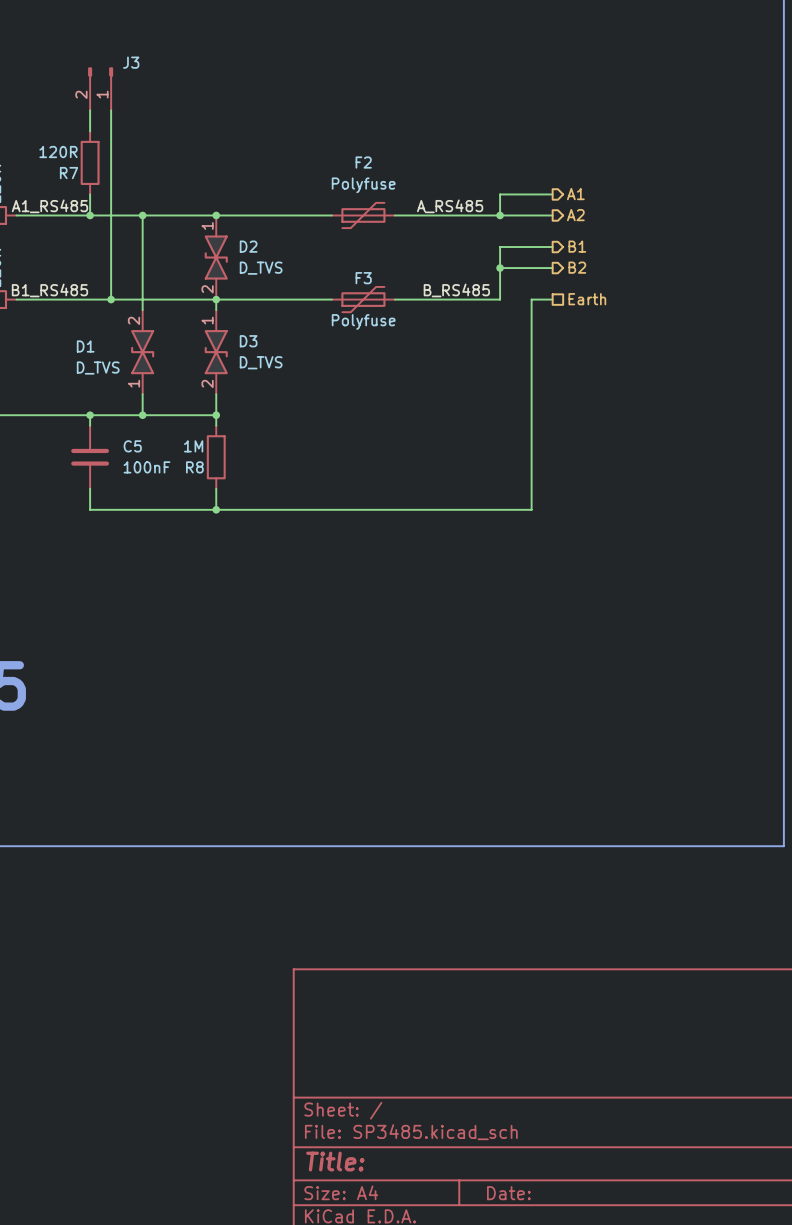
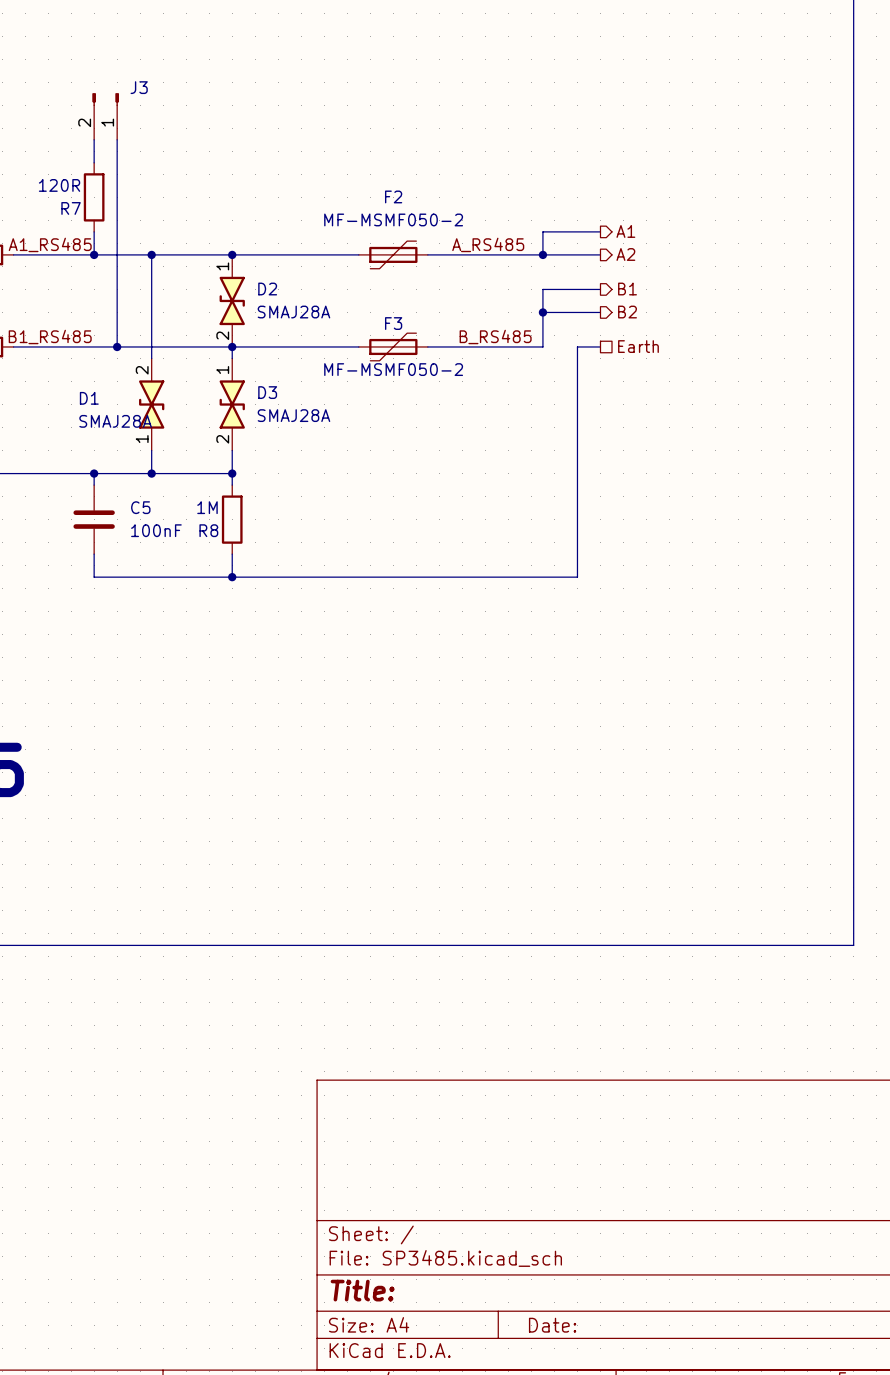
F2 value: Polyfuse (363, 185) -> MF-MSMF050-2 (393, 219)
D2 value: D_TVS (261, 268) -> SMAJ28A (293, 312)
F3 value: Polyfuse (363, 321) -> MF-MSMF050-2 (393, 369)
D3 value: D_TVS (261, 362) -> SMAJ28A (293, 415)
D1 value: D_TVS (98, 368) -> SMAJ28A (115, 421)

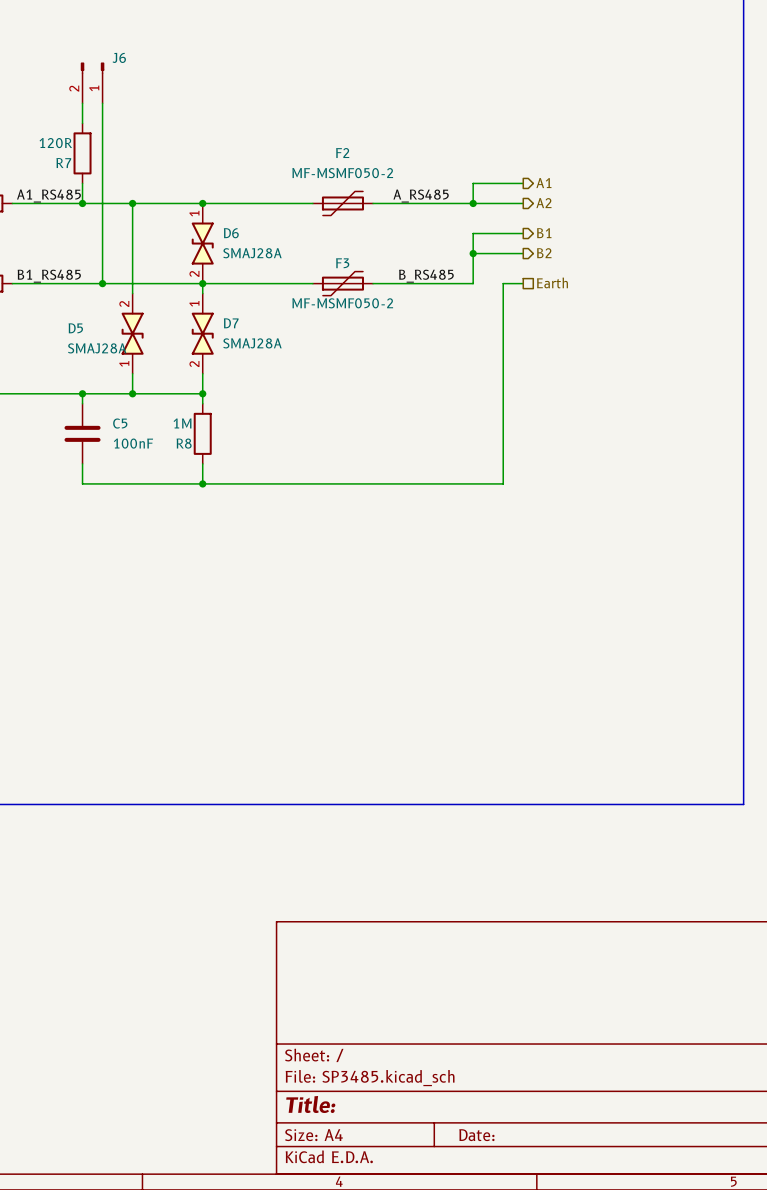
J3 name: J3 (139, 87) -> J6 (119, 57)
D2 name: D2 (267, 289) -> D6 (231, 233)
D3 name: D3 (267, 392) -> D7 (231, 323)
D1 name: D1 (89, 398) -> D5 (75, 328)

